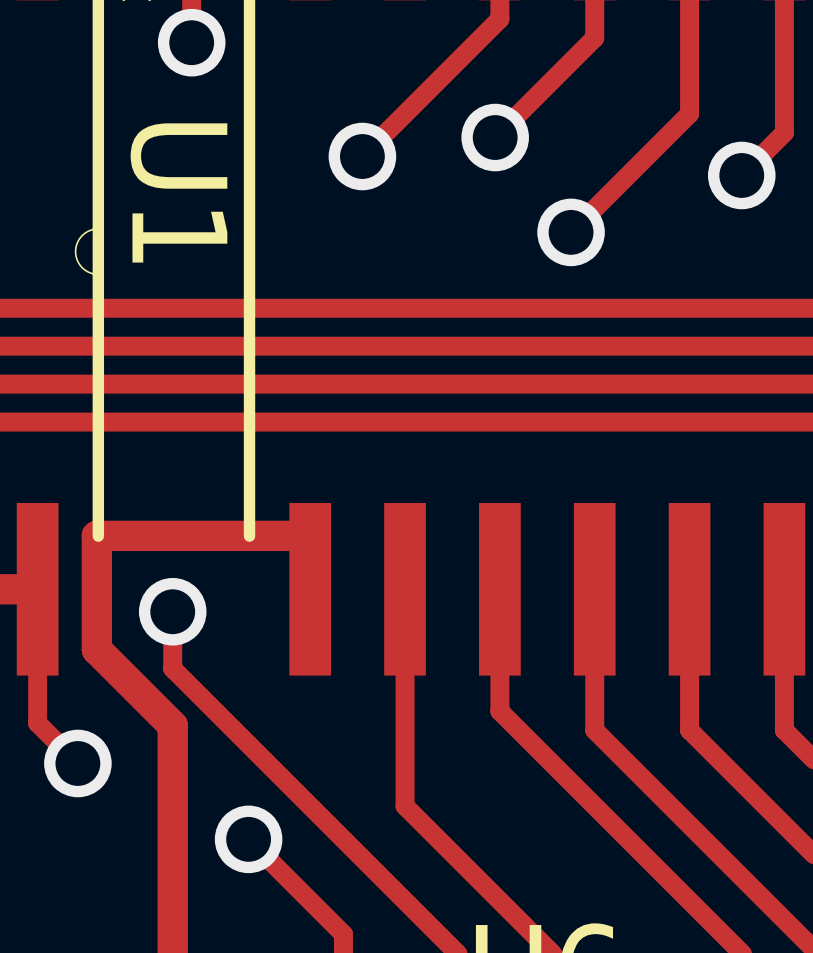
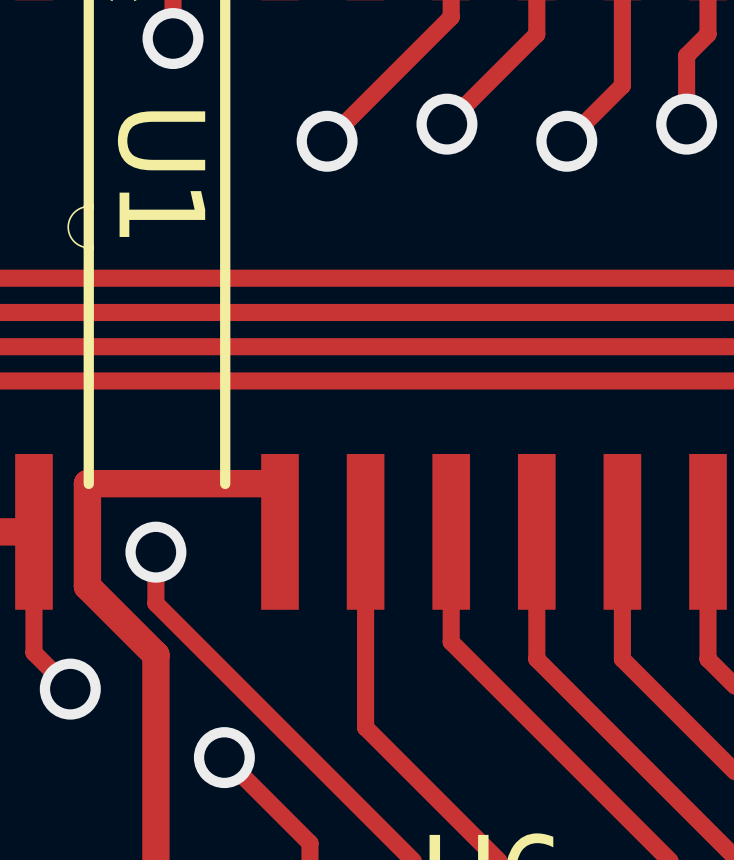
track: (784, 38) (784, 132) (741, 175) -> (708, 34) (686, 55) (686, 124)
track: (689, 94) (689, 113) (571, 232) -> (622, 85) (566, 141)
via: none -> (566, 141)
via position: (741, 175) -> (686, 124)
via: (571, 232) -> none

